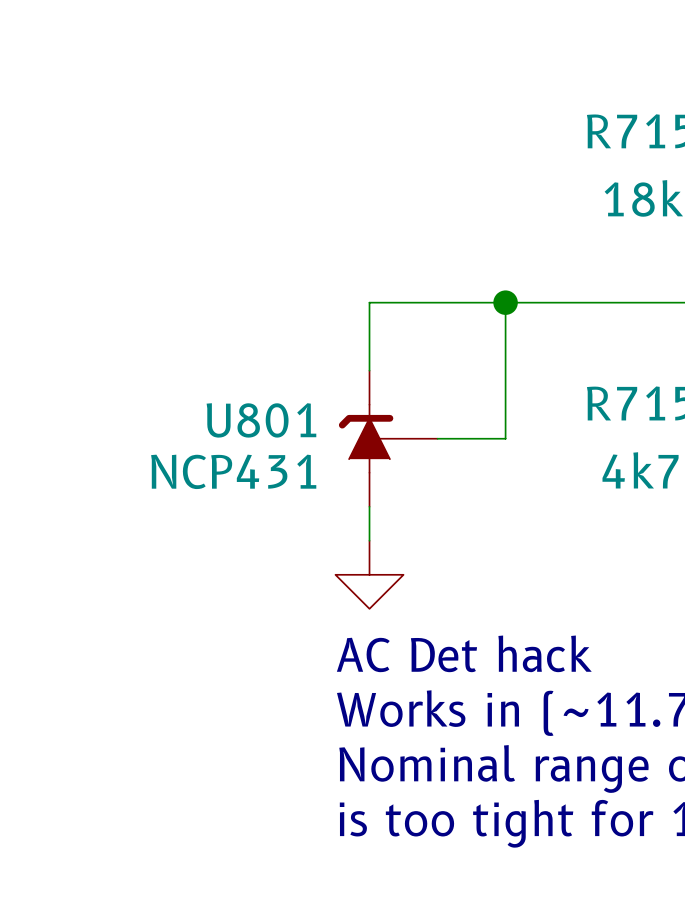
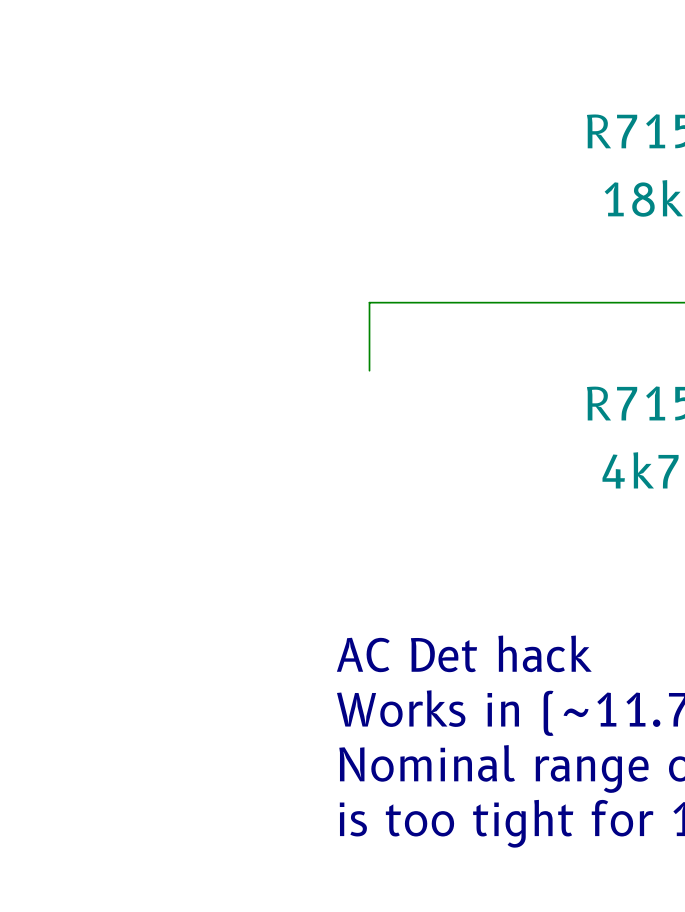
wire: (505, 302) (505, 438) (437, 438) -> none
junction: (505, 302) -> none
U801: NCP431 (388, 438) -> none
wire: (369, 506) (369, 540) -> none
power symbol: (369, 574) -> none

